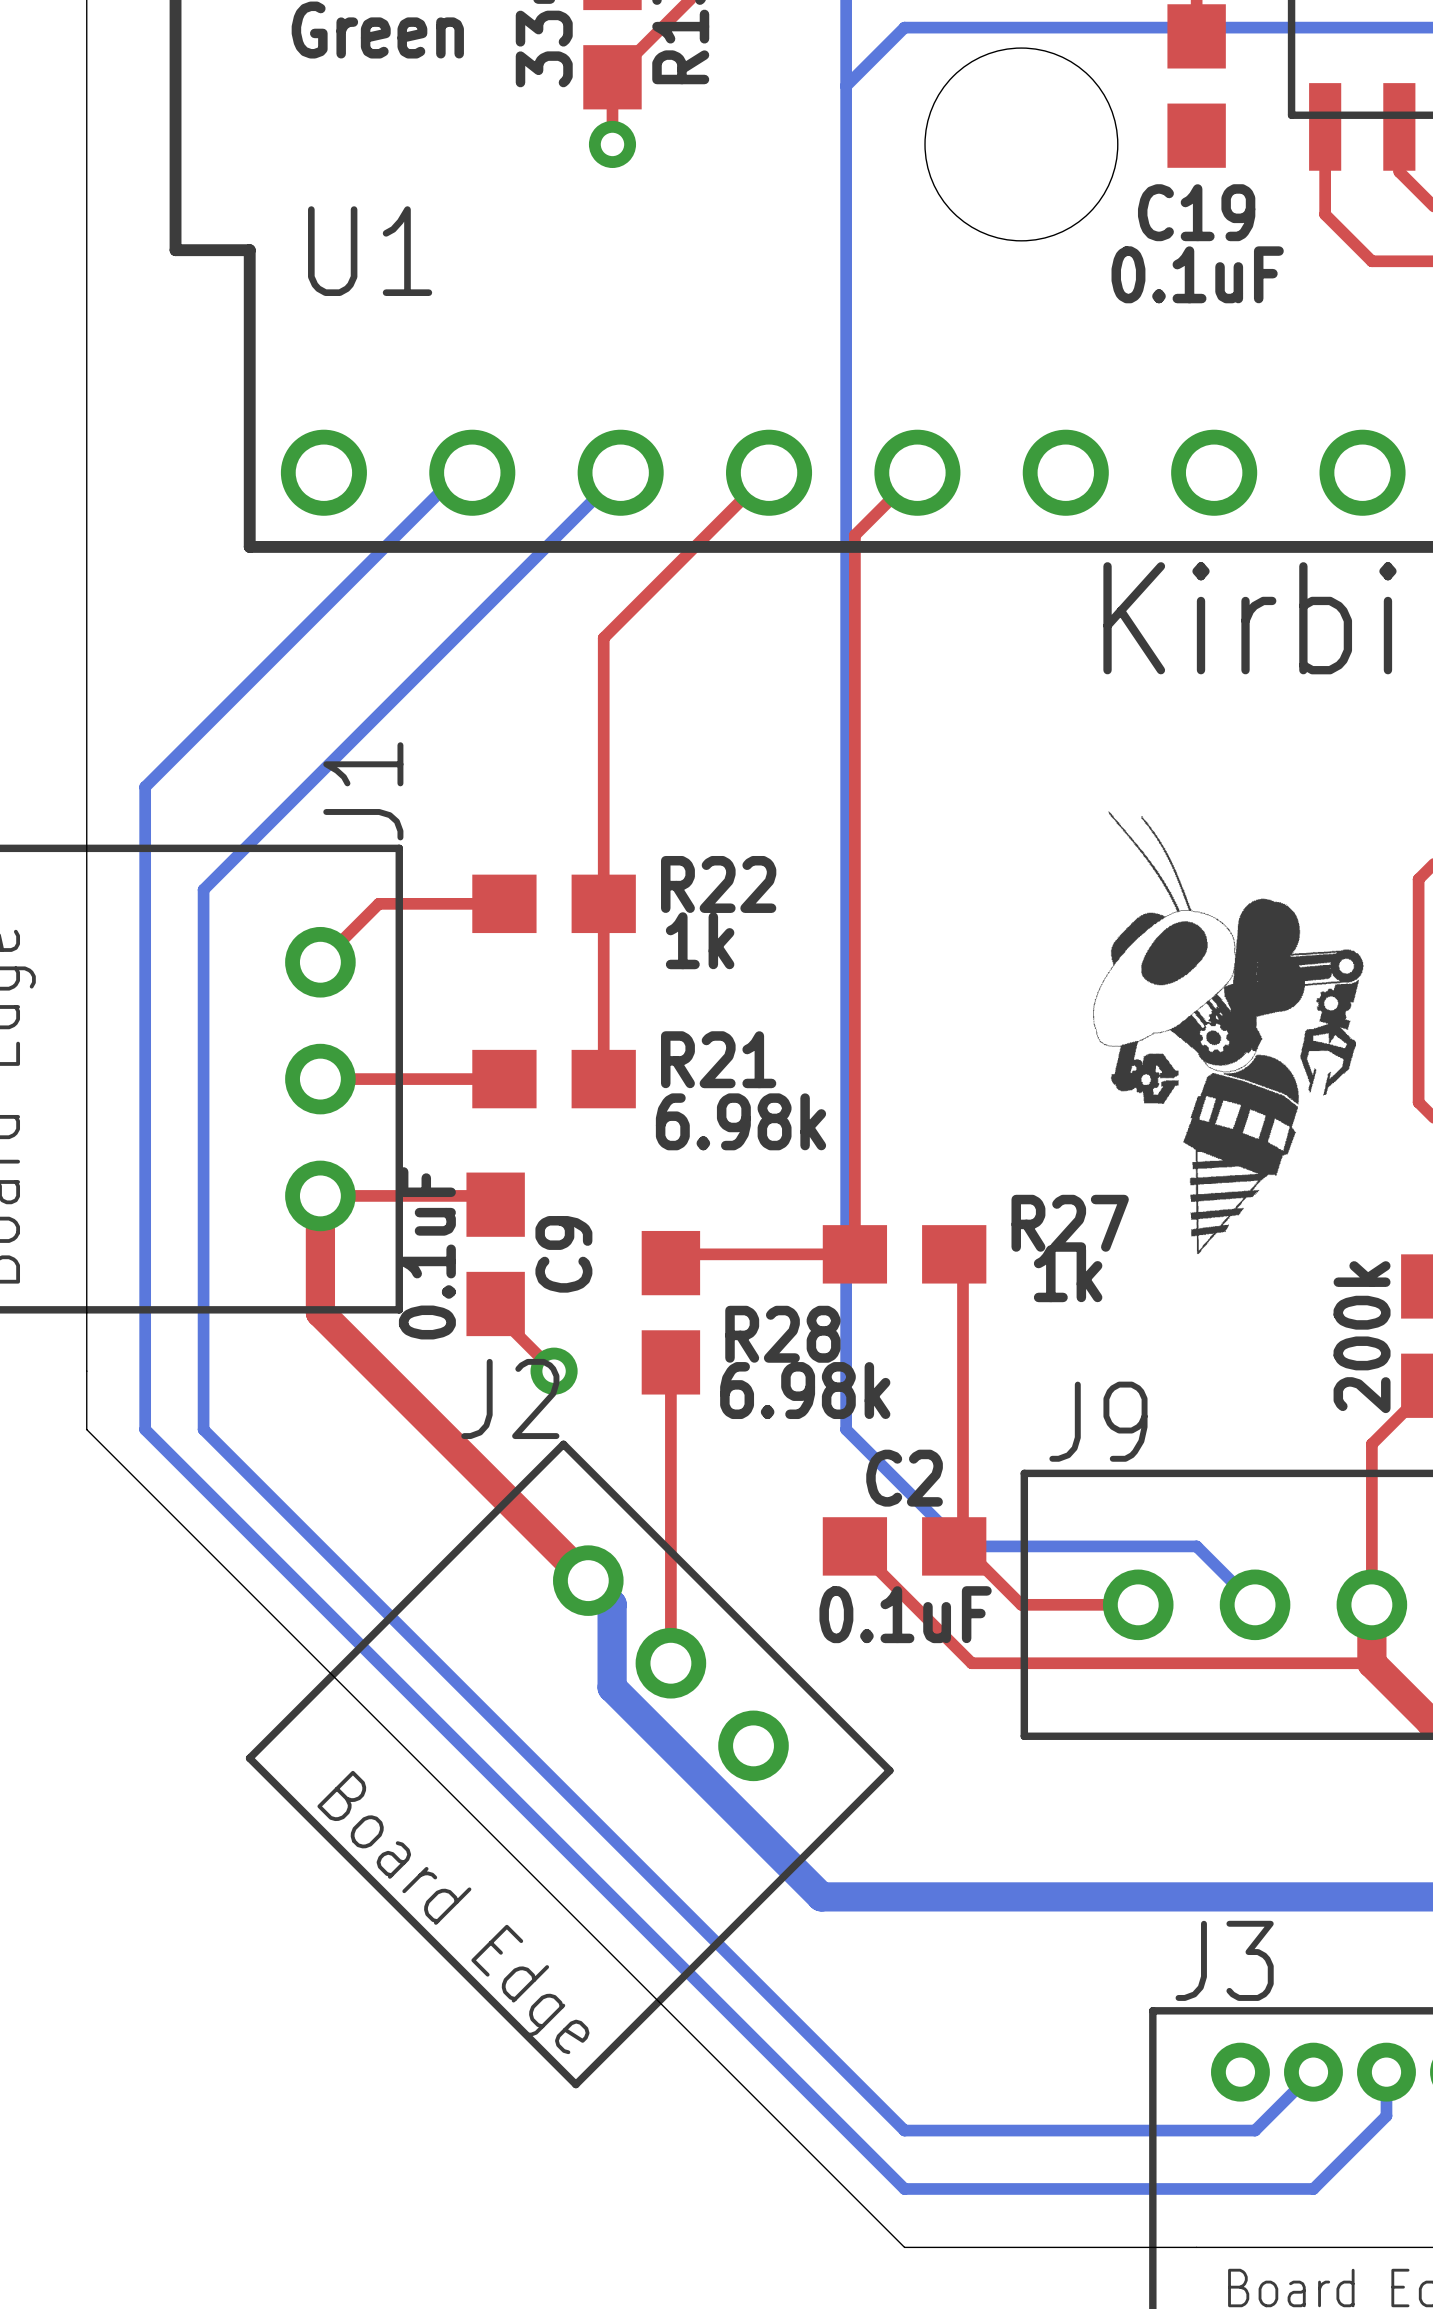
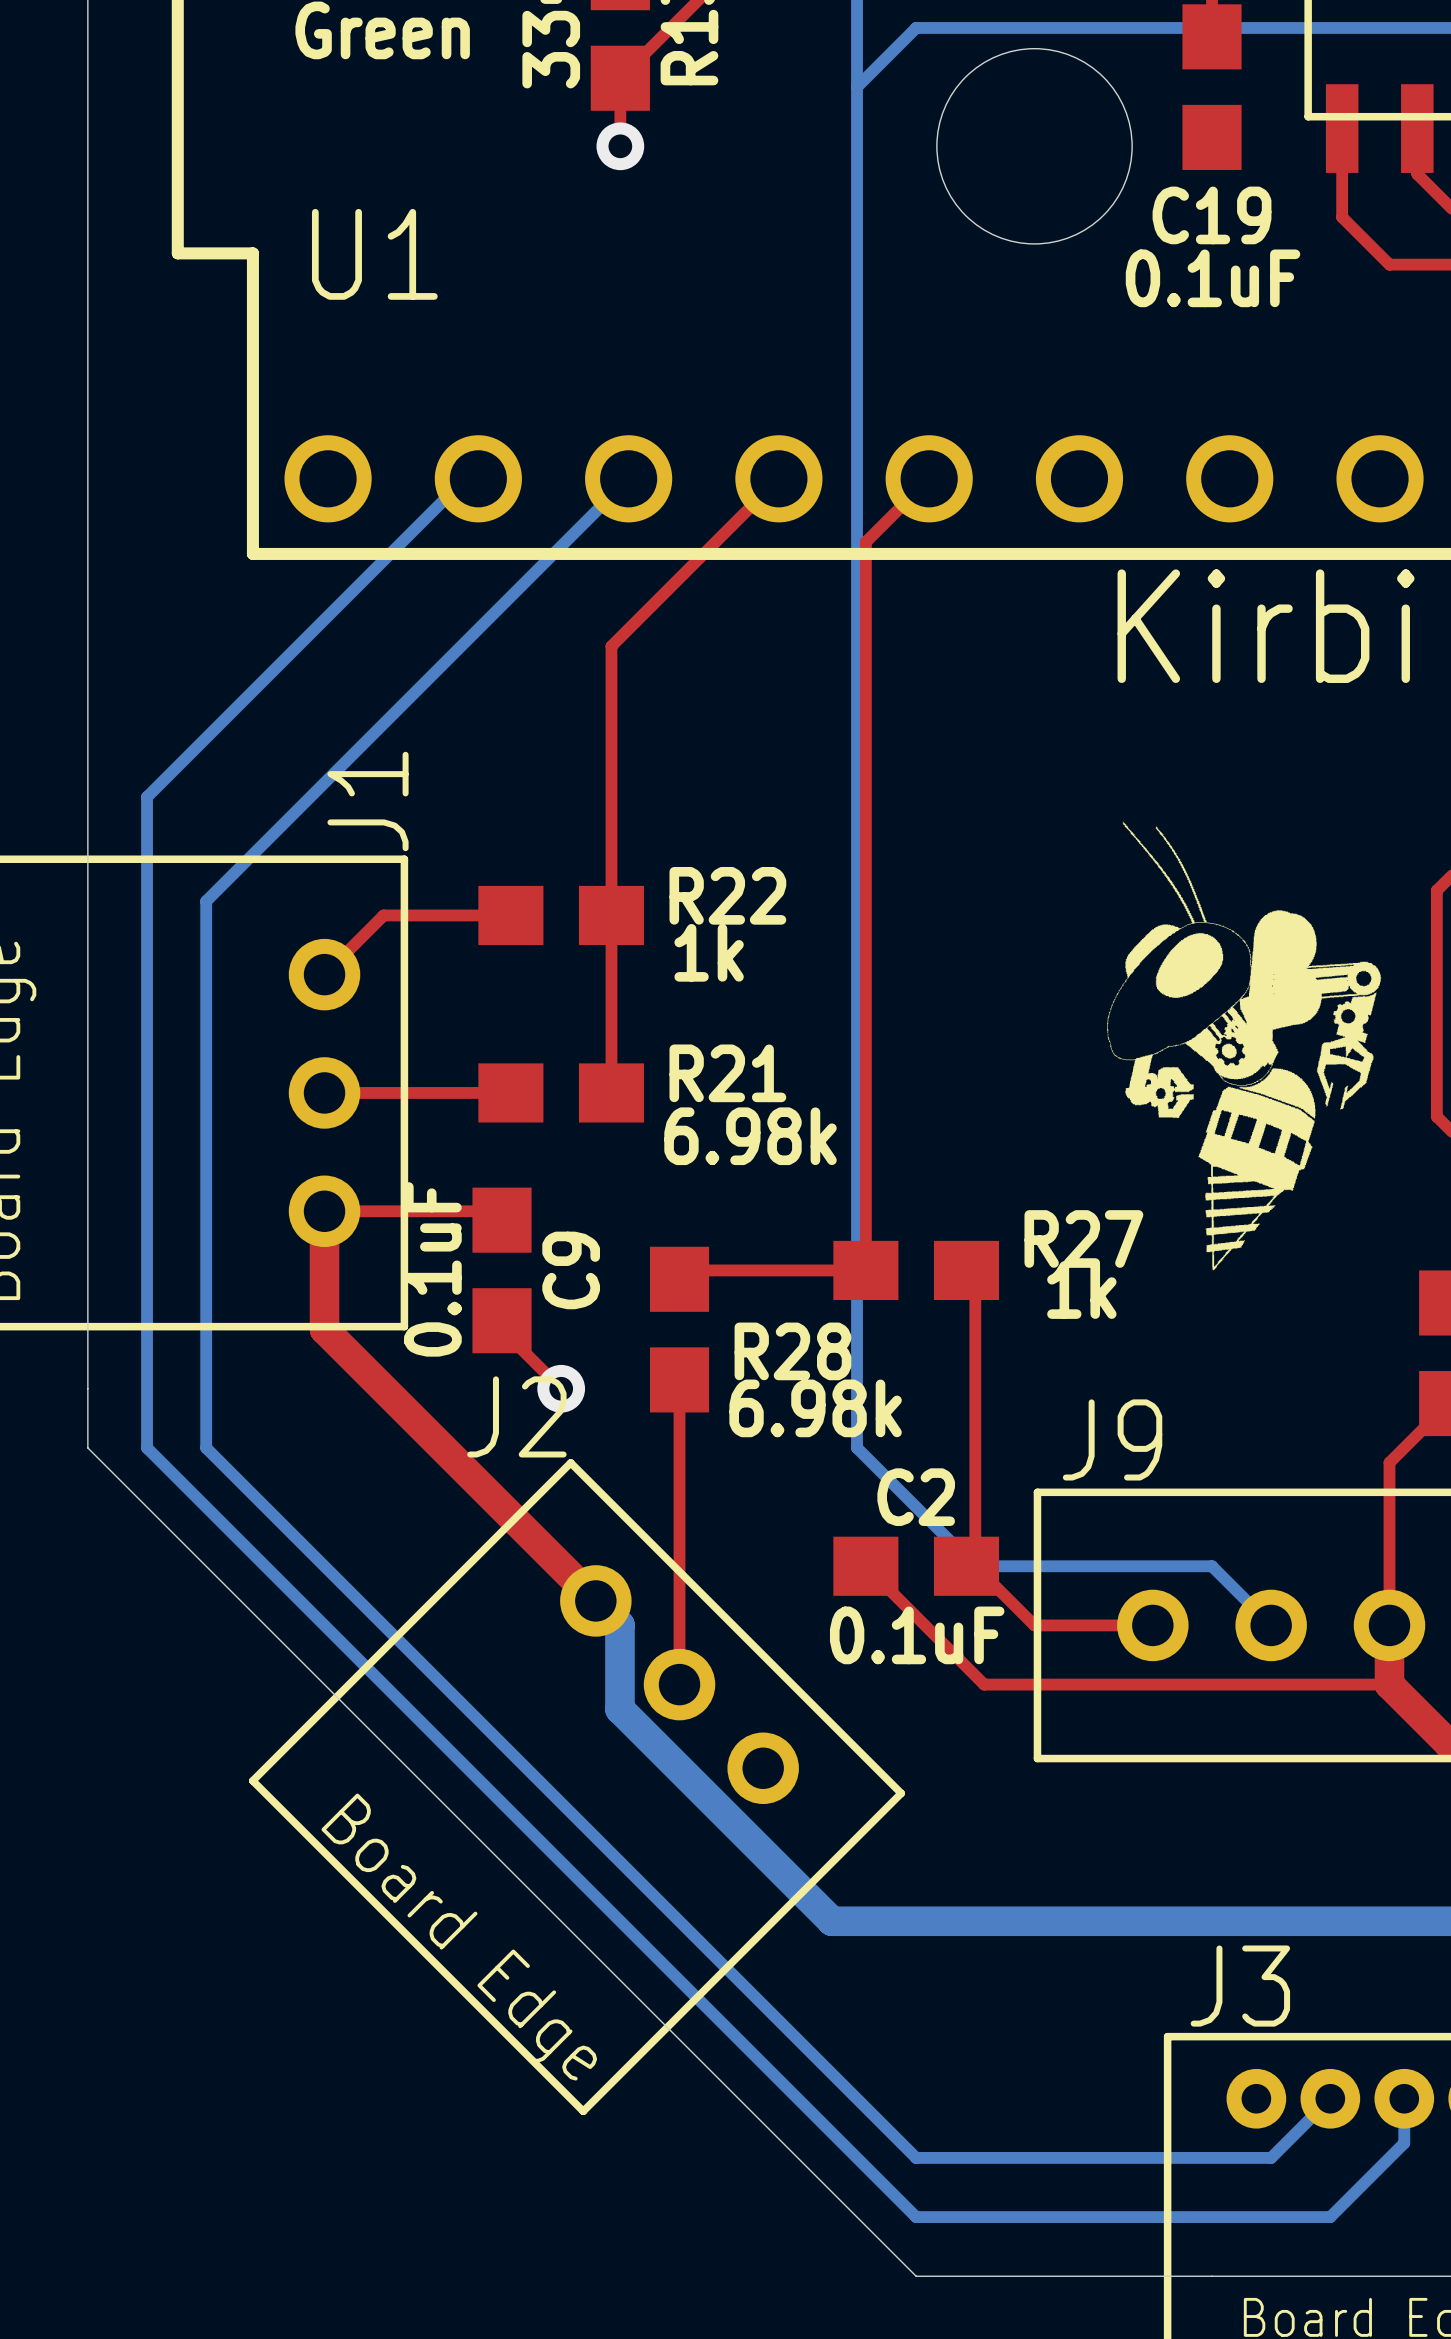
part value: 200k (1362, 1337) -> none

